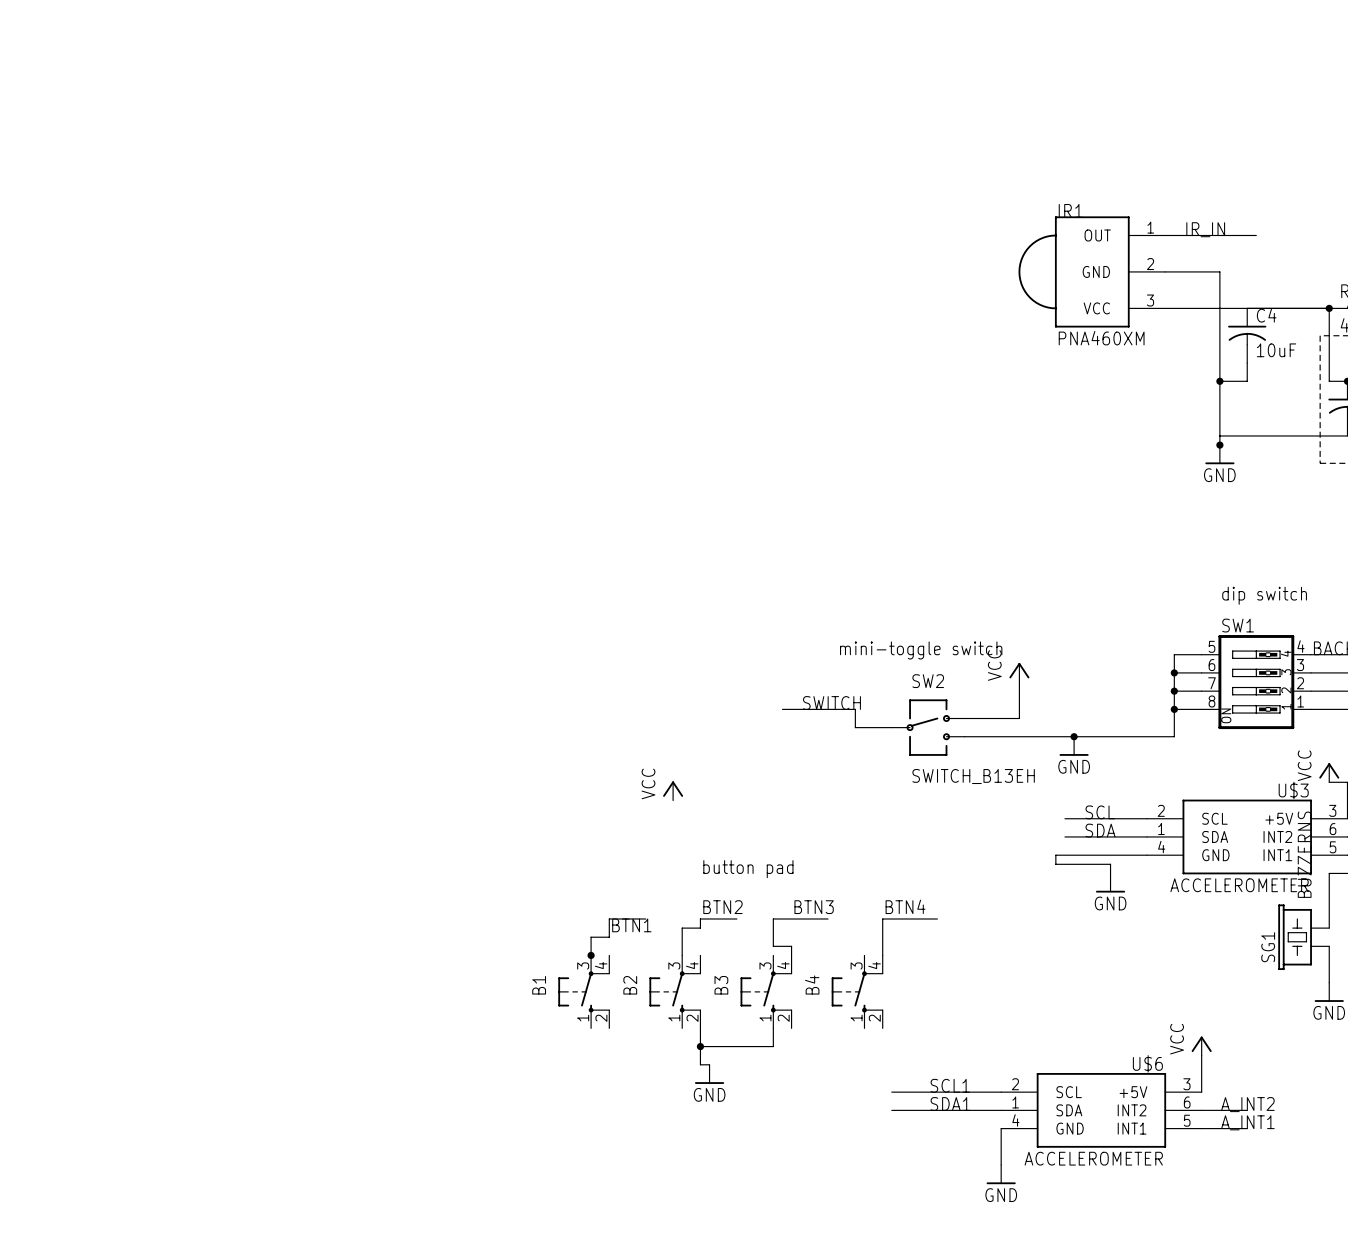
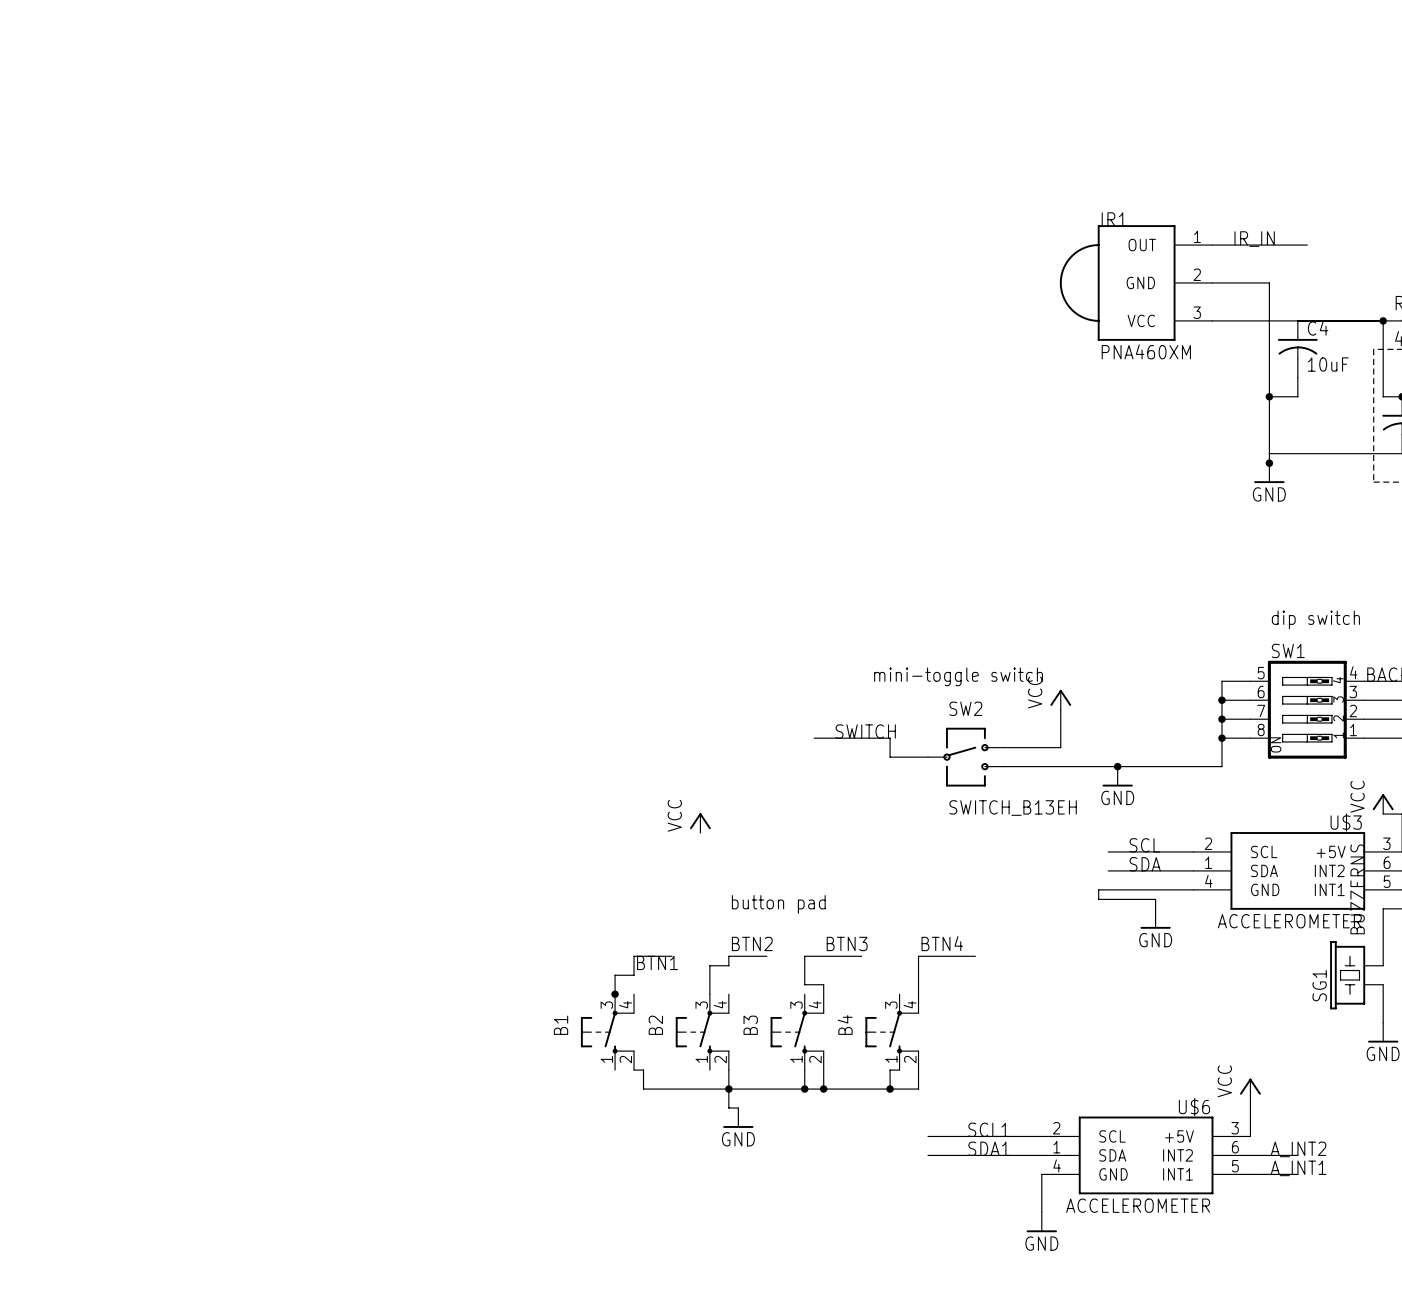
wire: none -> (634, 1070) (643, 1070) (643, 1089) (728, 1089)
wire: none -> (823, 1070) (823, 1089)
wire: none -> (899, 1070) (890, 1070) (890, 1089)
wire: none -> (918, 1070) (918, 1089) (804, 1089)
junction: none -> (804, 1089)
junction: none -> (823, 1089)
junction: none -> (890, 1089)

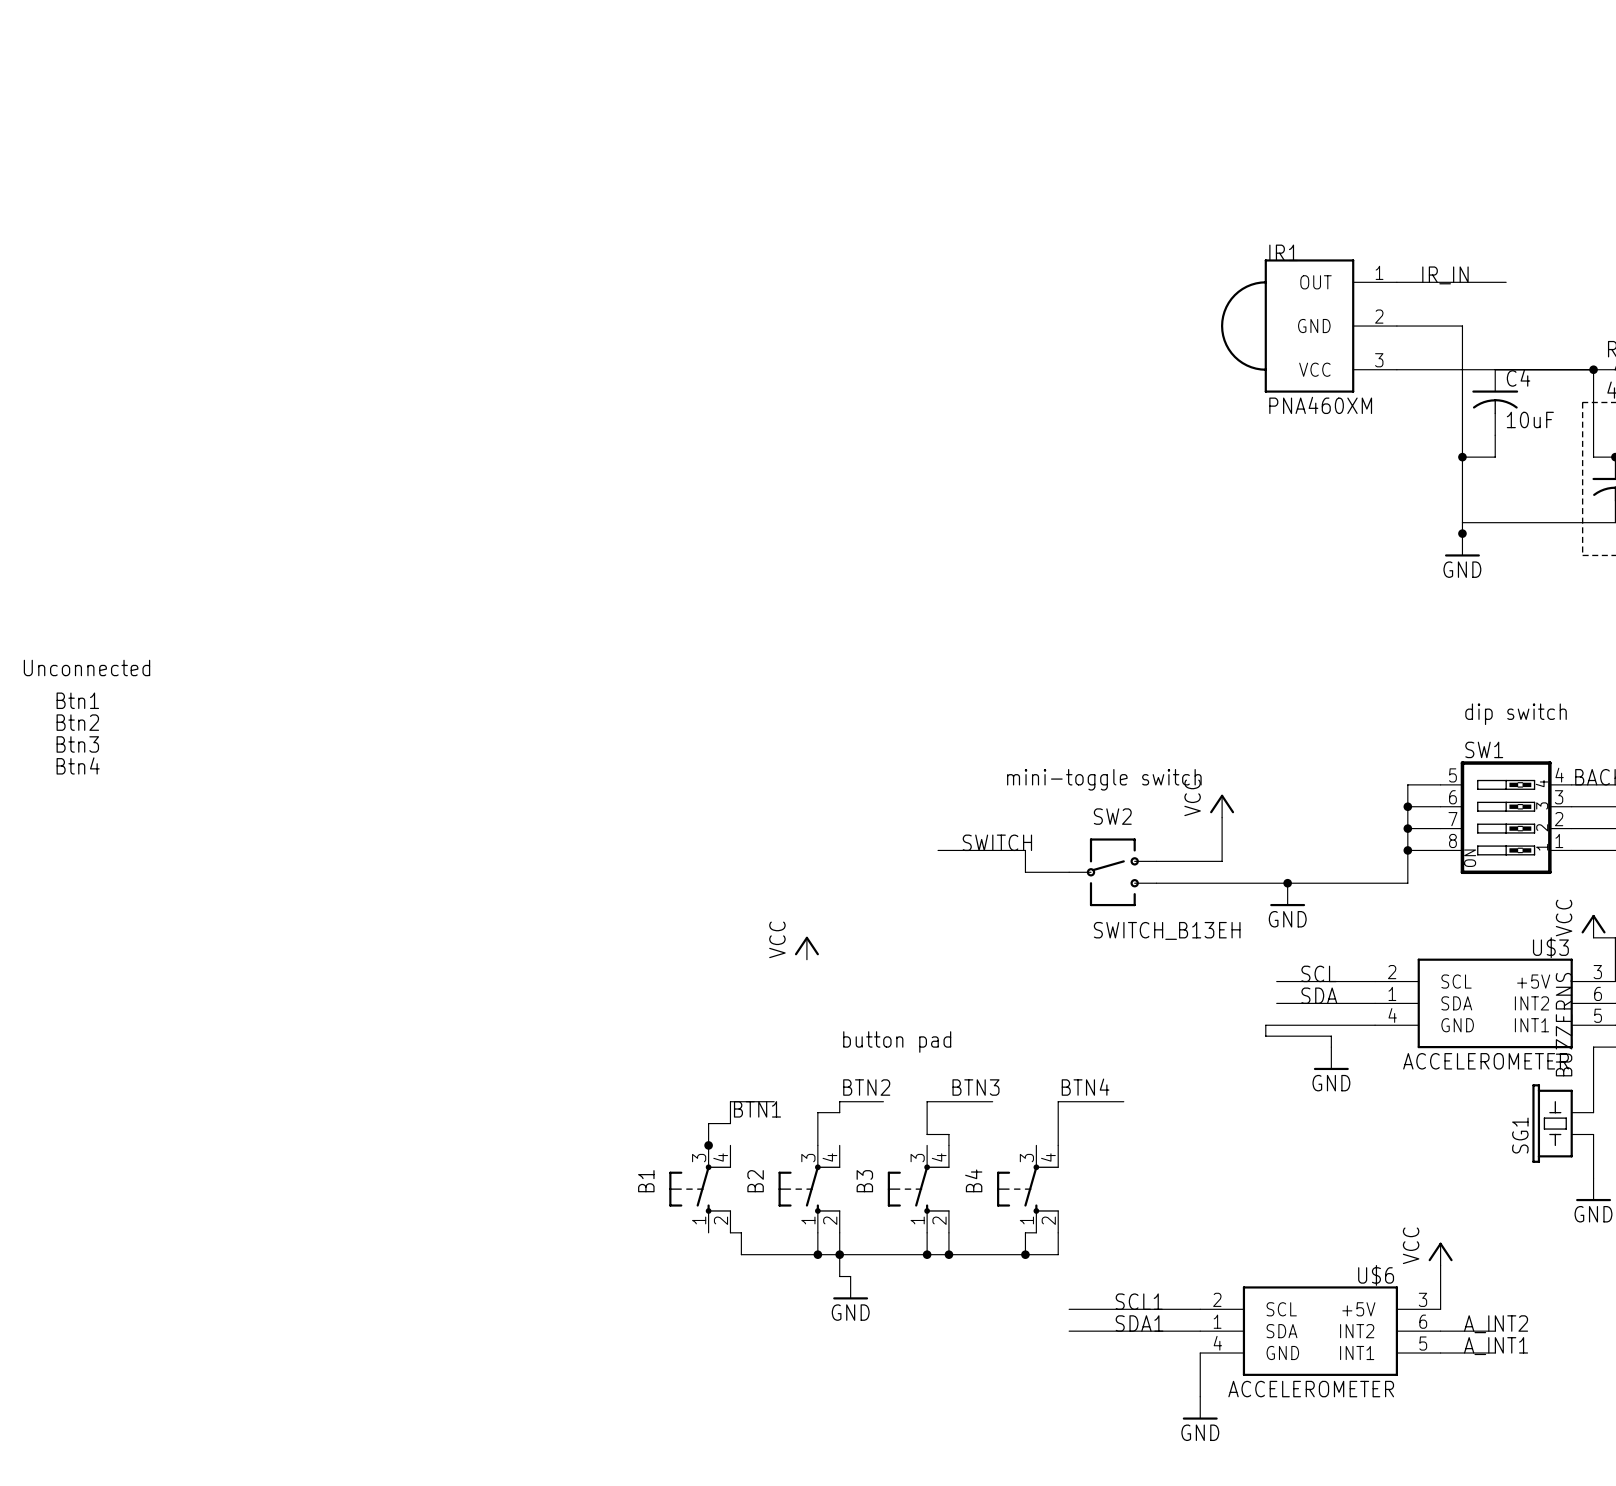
text: none -> Unconnected (86, 667)
text: none -> Btn1 (77, 700)
text: none -> Btn2 (77, 722)
text: none -> Btn3 (77, 744)
text: none -> Btn4 (78, 765)
wire: none -> (817, 1232) (817, 1254)
junction: none -> (817, 1254)

